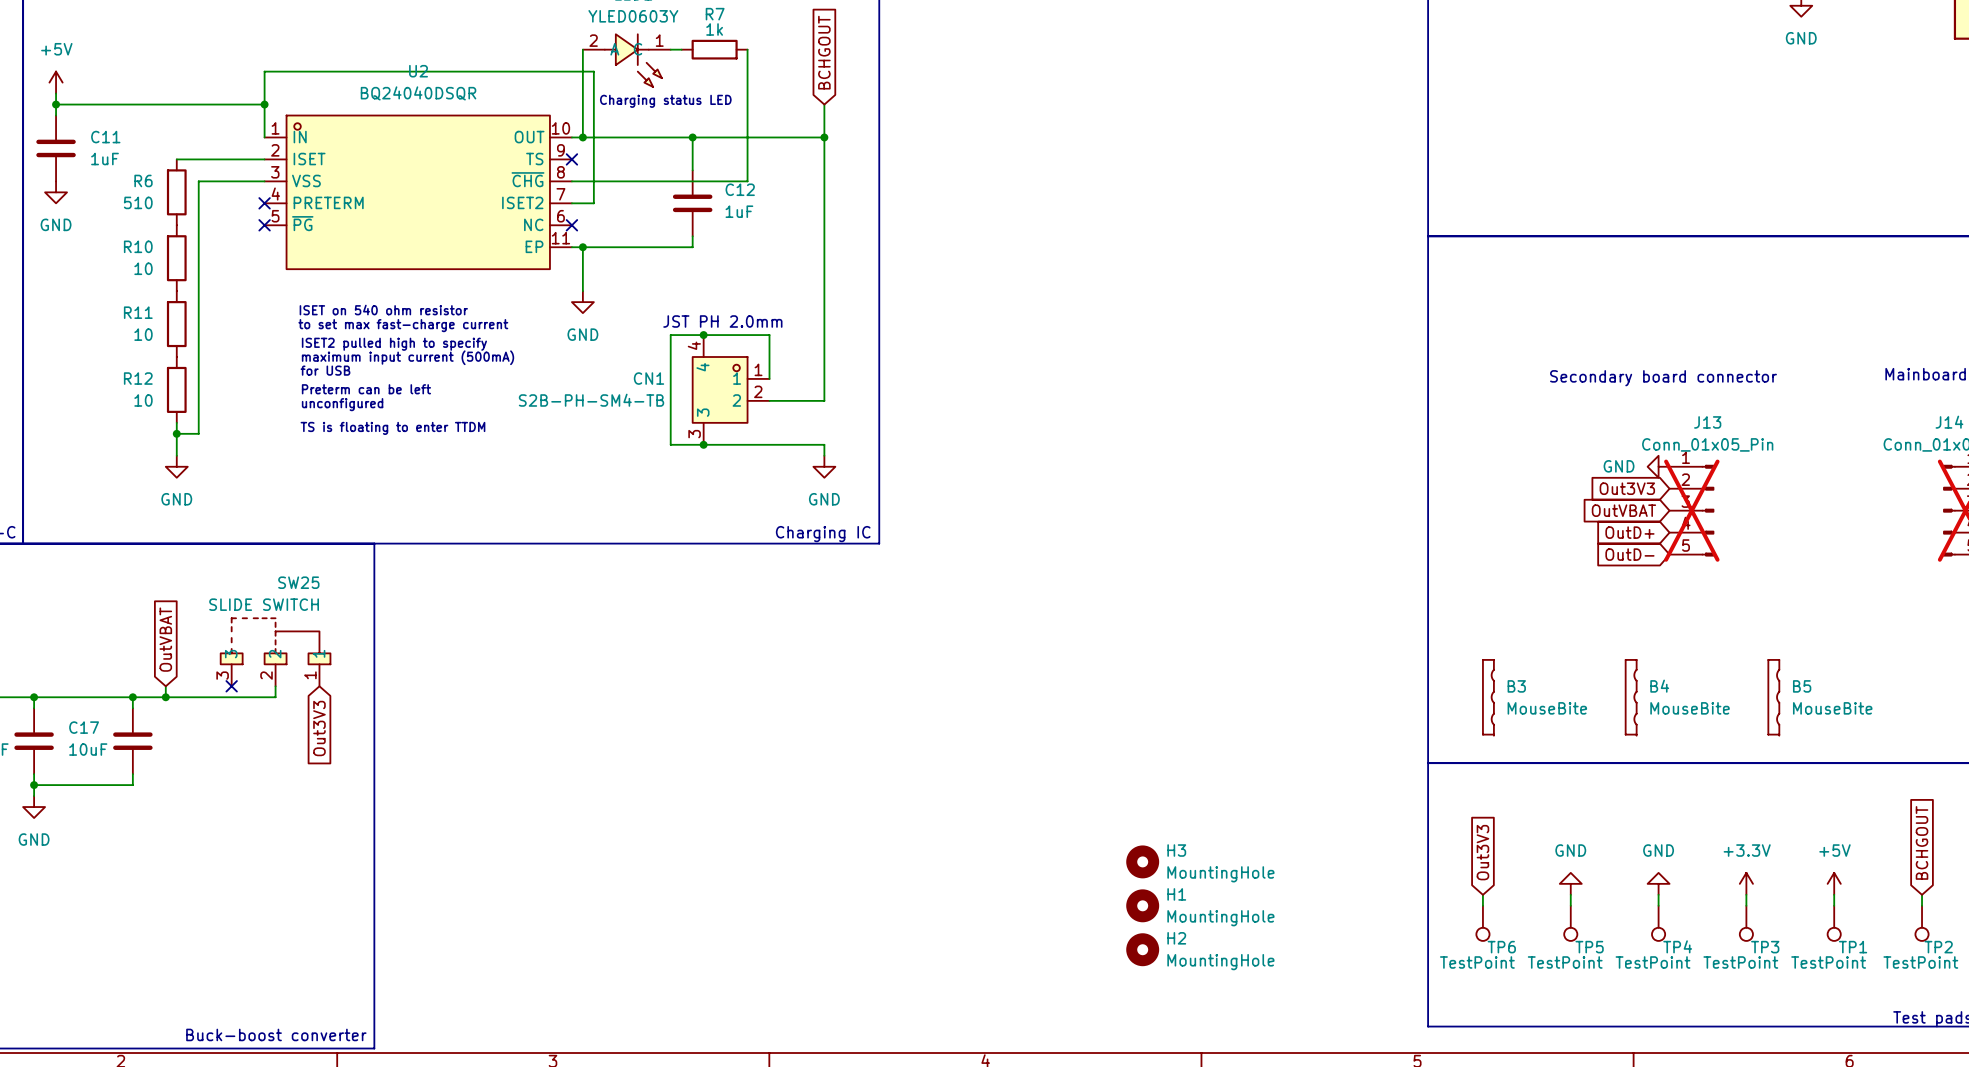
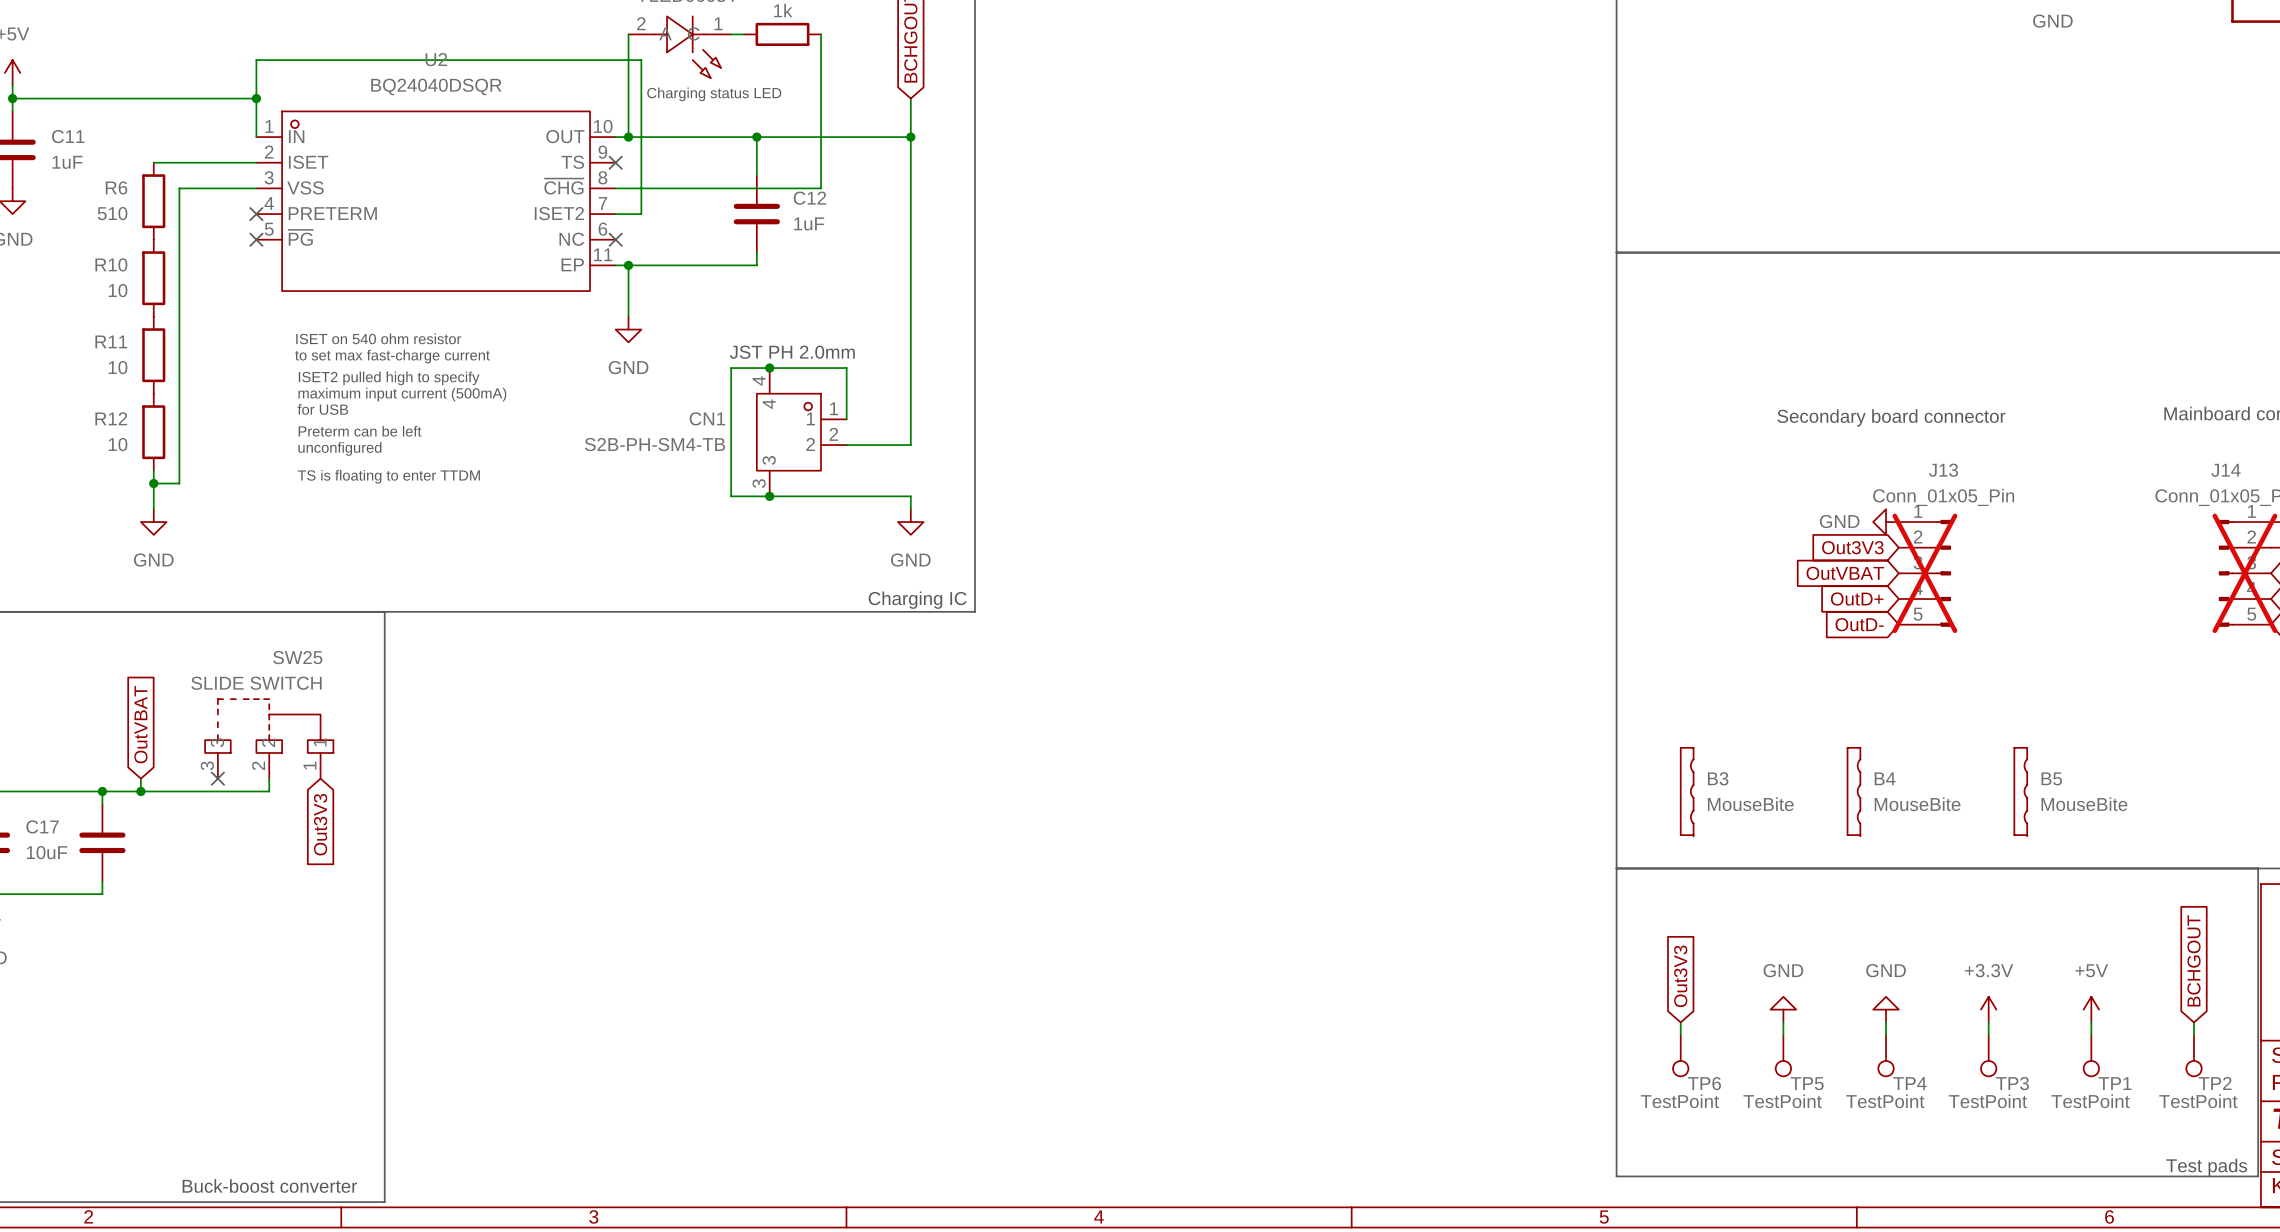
H3: MountingHole (1142, 861) -> none
H1: MountingHole (1142, 905) -> none
H2: MountingHole (1142, 949) -> none

